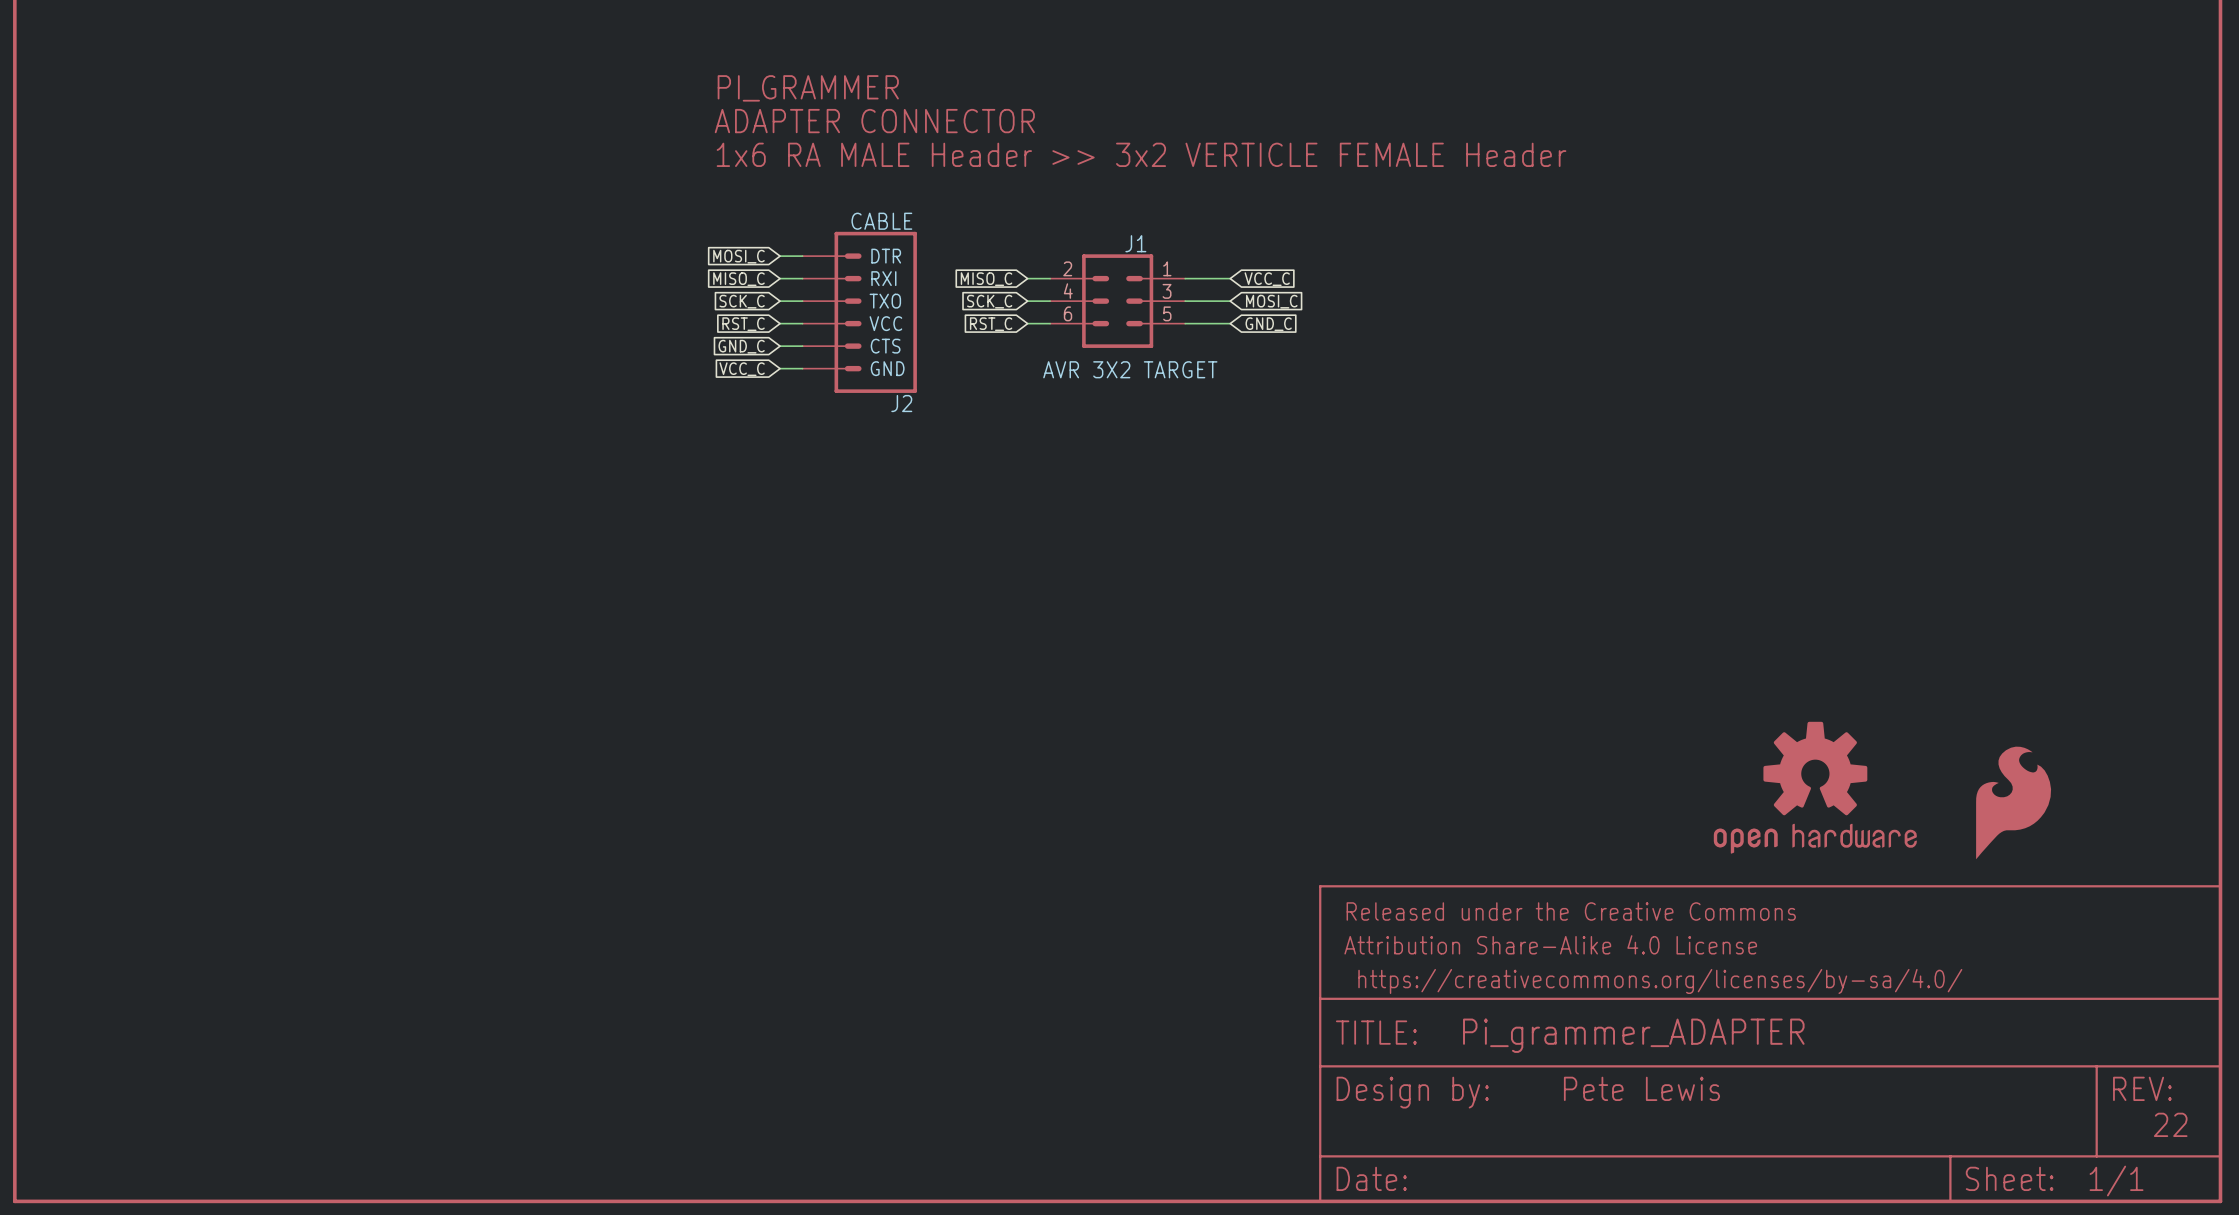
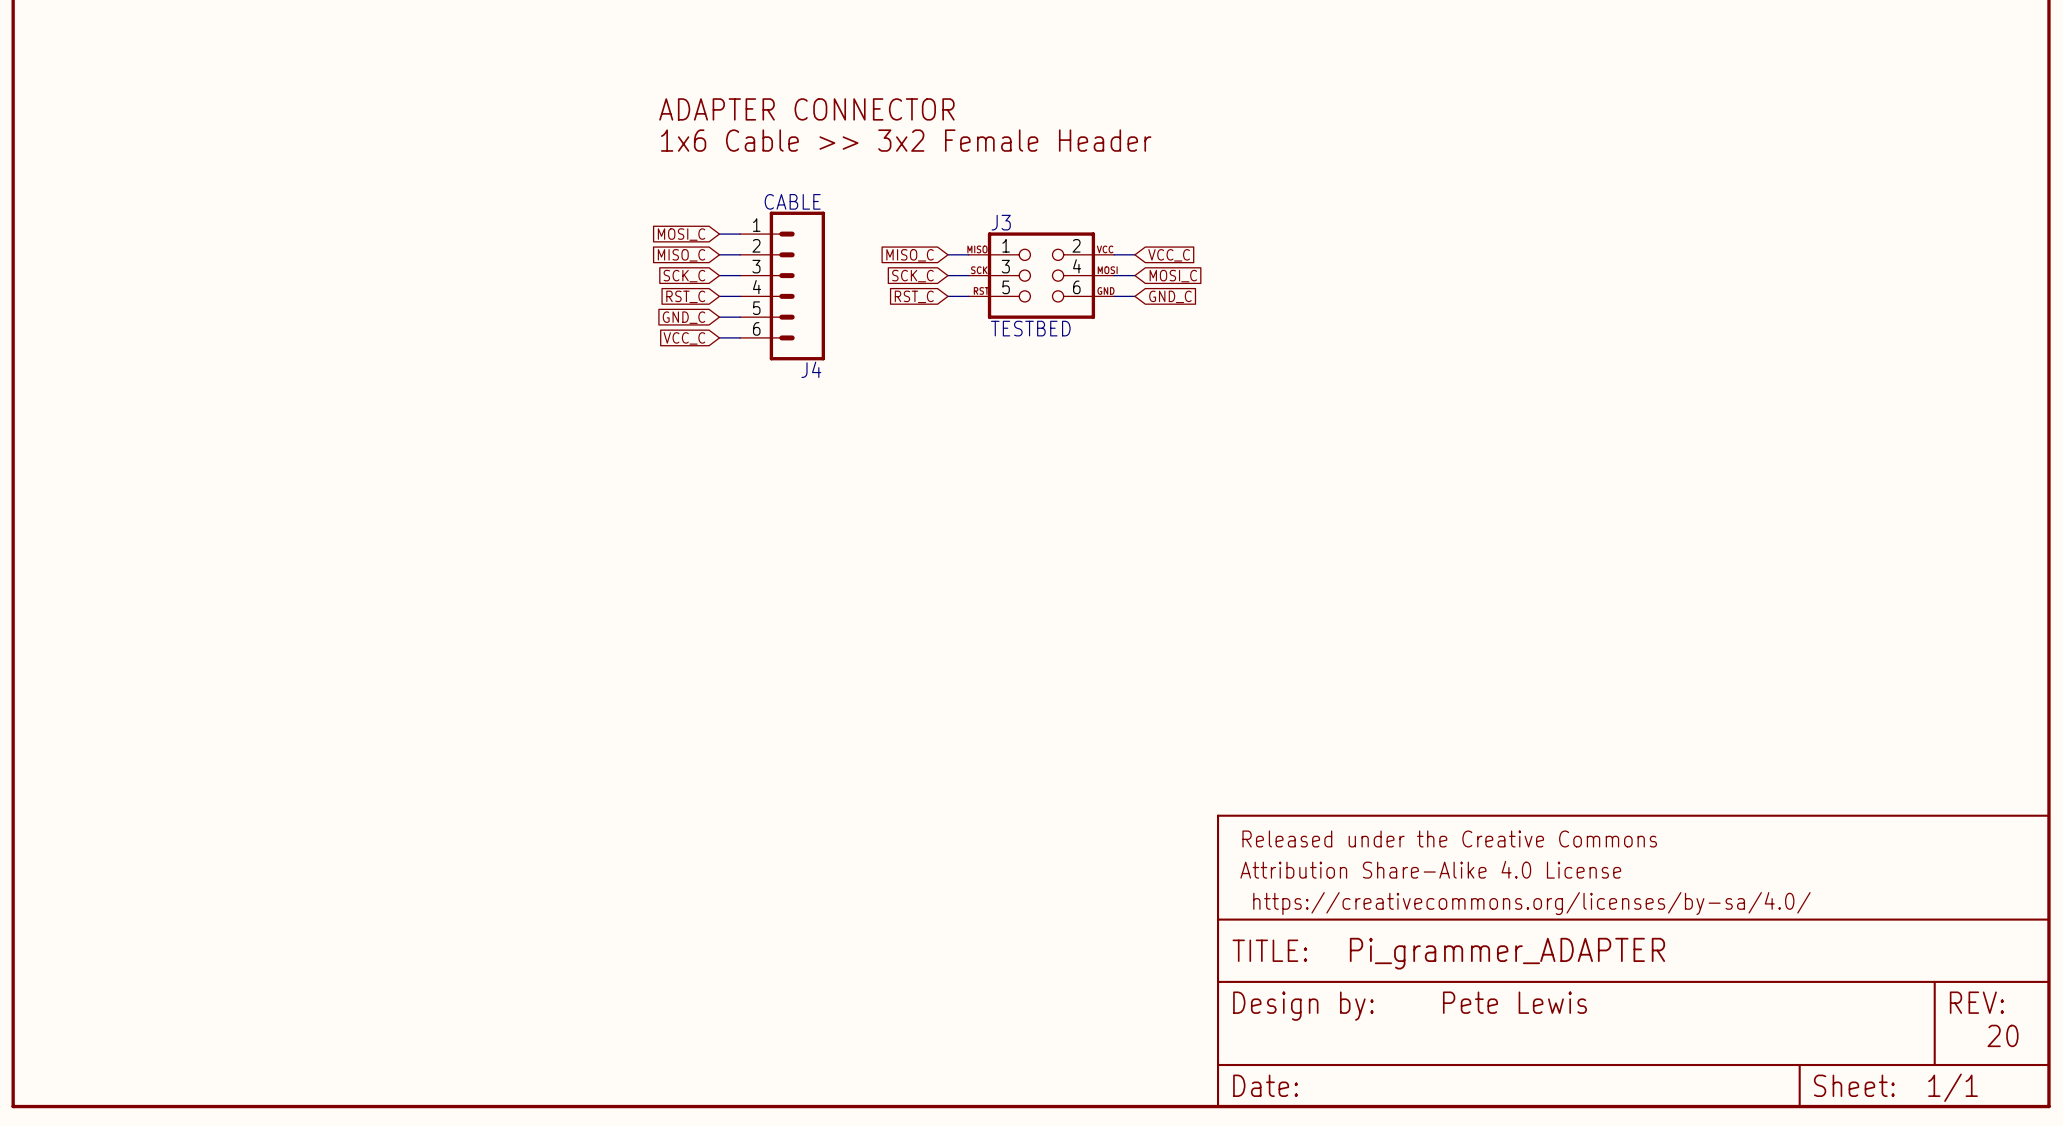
text: PI_GRAMMER (808, 88) -> none
text: 1x6 RA MALE Header >> 3x2 VERTICLE FEMALE Header (1141, 154) -> 1x6 Cable >> 3x2 Female Header (906, 140)
J1: AVR 3X2 TARGET (1117, 301) -> none
J3: none -> TESTBED (1041, 275)
J4: none -> CABLE (782, 285)
J2: CABLE (859, 312) -> none
part: (1815, 787) -> none
part: (2013, 802) -> none
text: 22 (2170, 1124) -> 20 (2003, 1035)

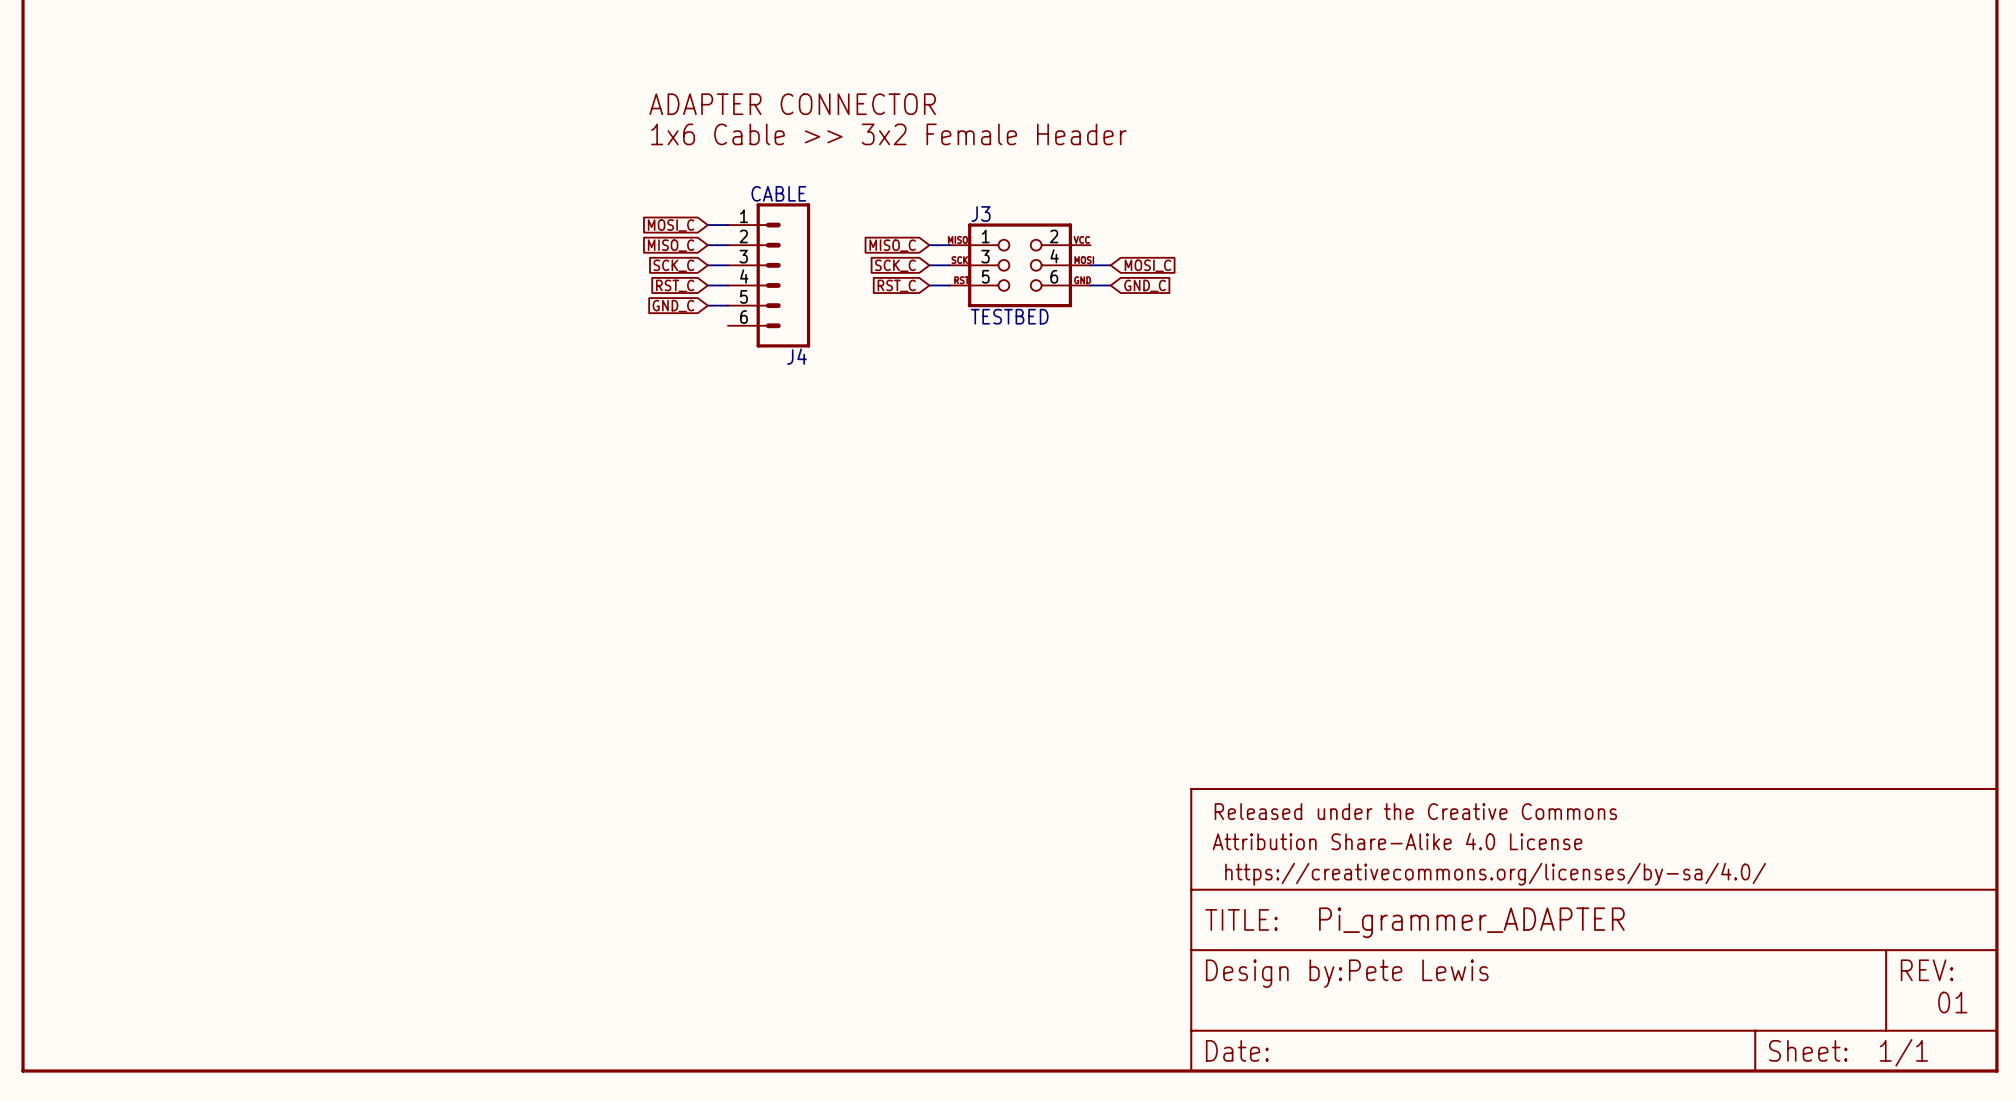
wire: (1114, 254) (1134, 254) -> none
global label: VCC_C (1169, 255) -> none
wire: (719, 337) (740, 337) -> none
global label: VCC_C (684, 338) -> none
text position: Pete Lewis (1515, 1002) -> Pete Lewis (1418, 970)
text: 20 (2003, 1035) -> 01 (1952, 1002)

